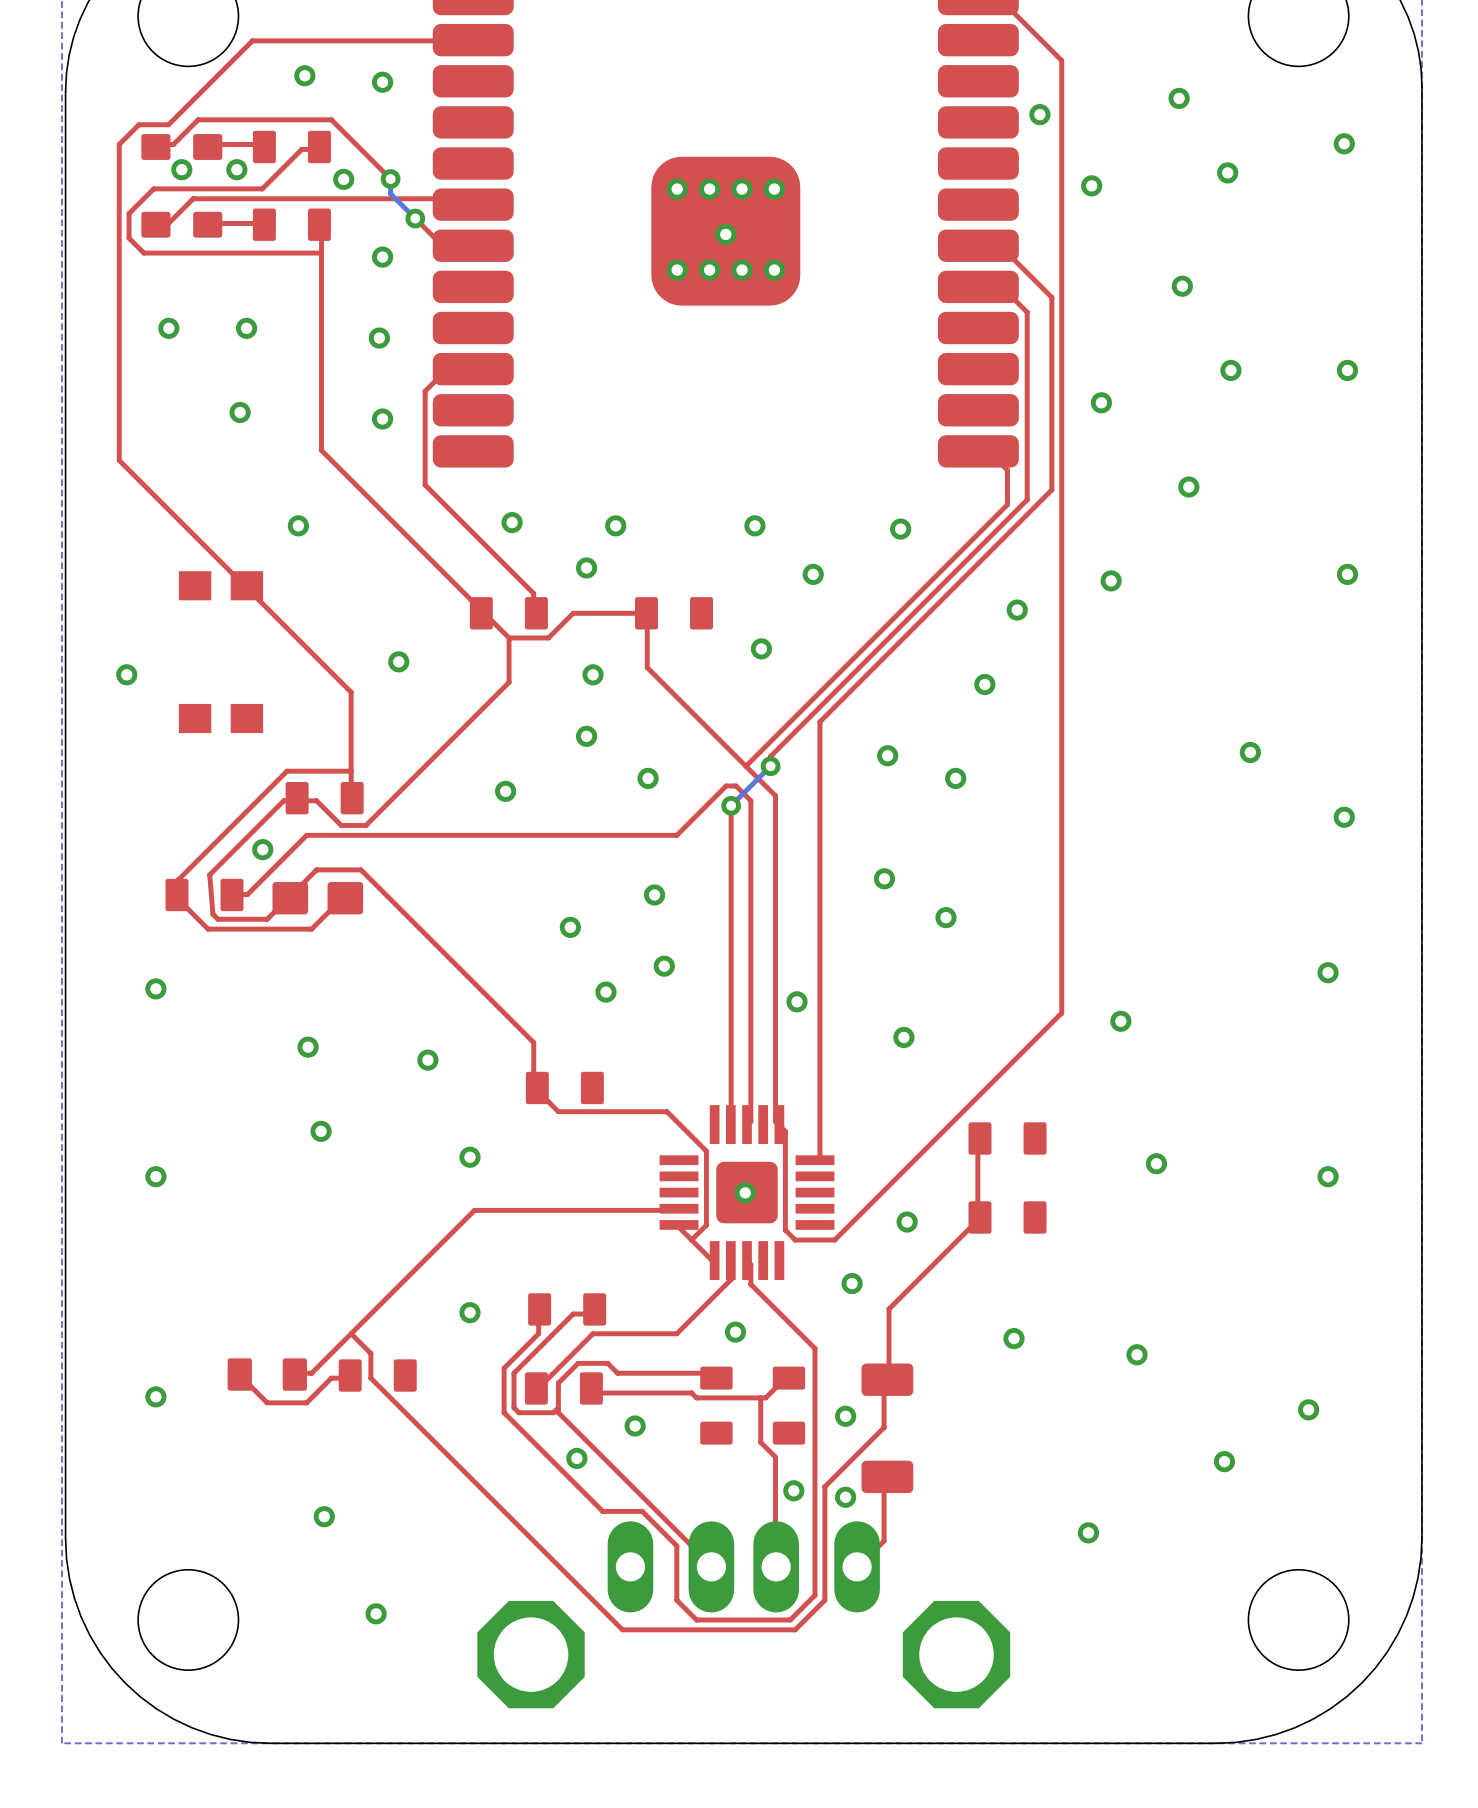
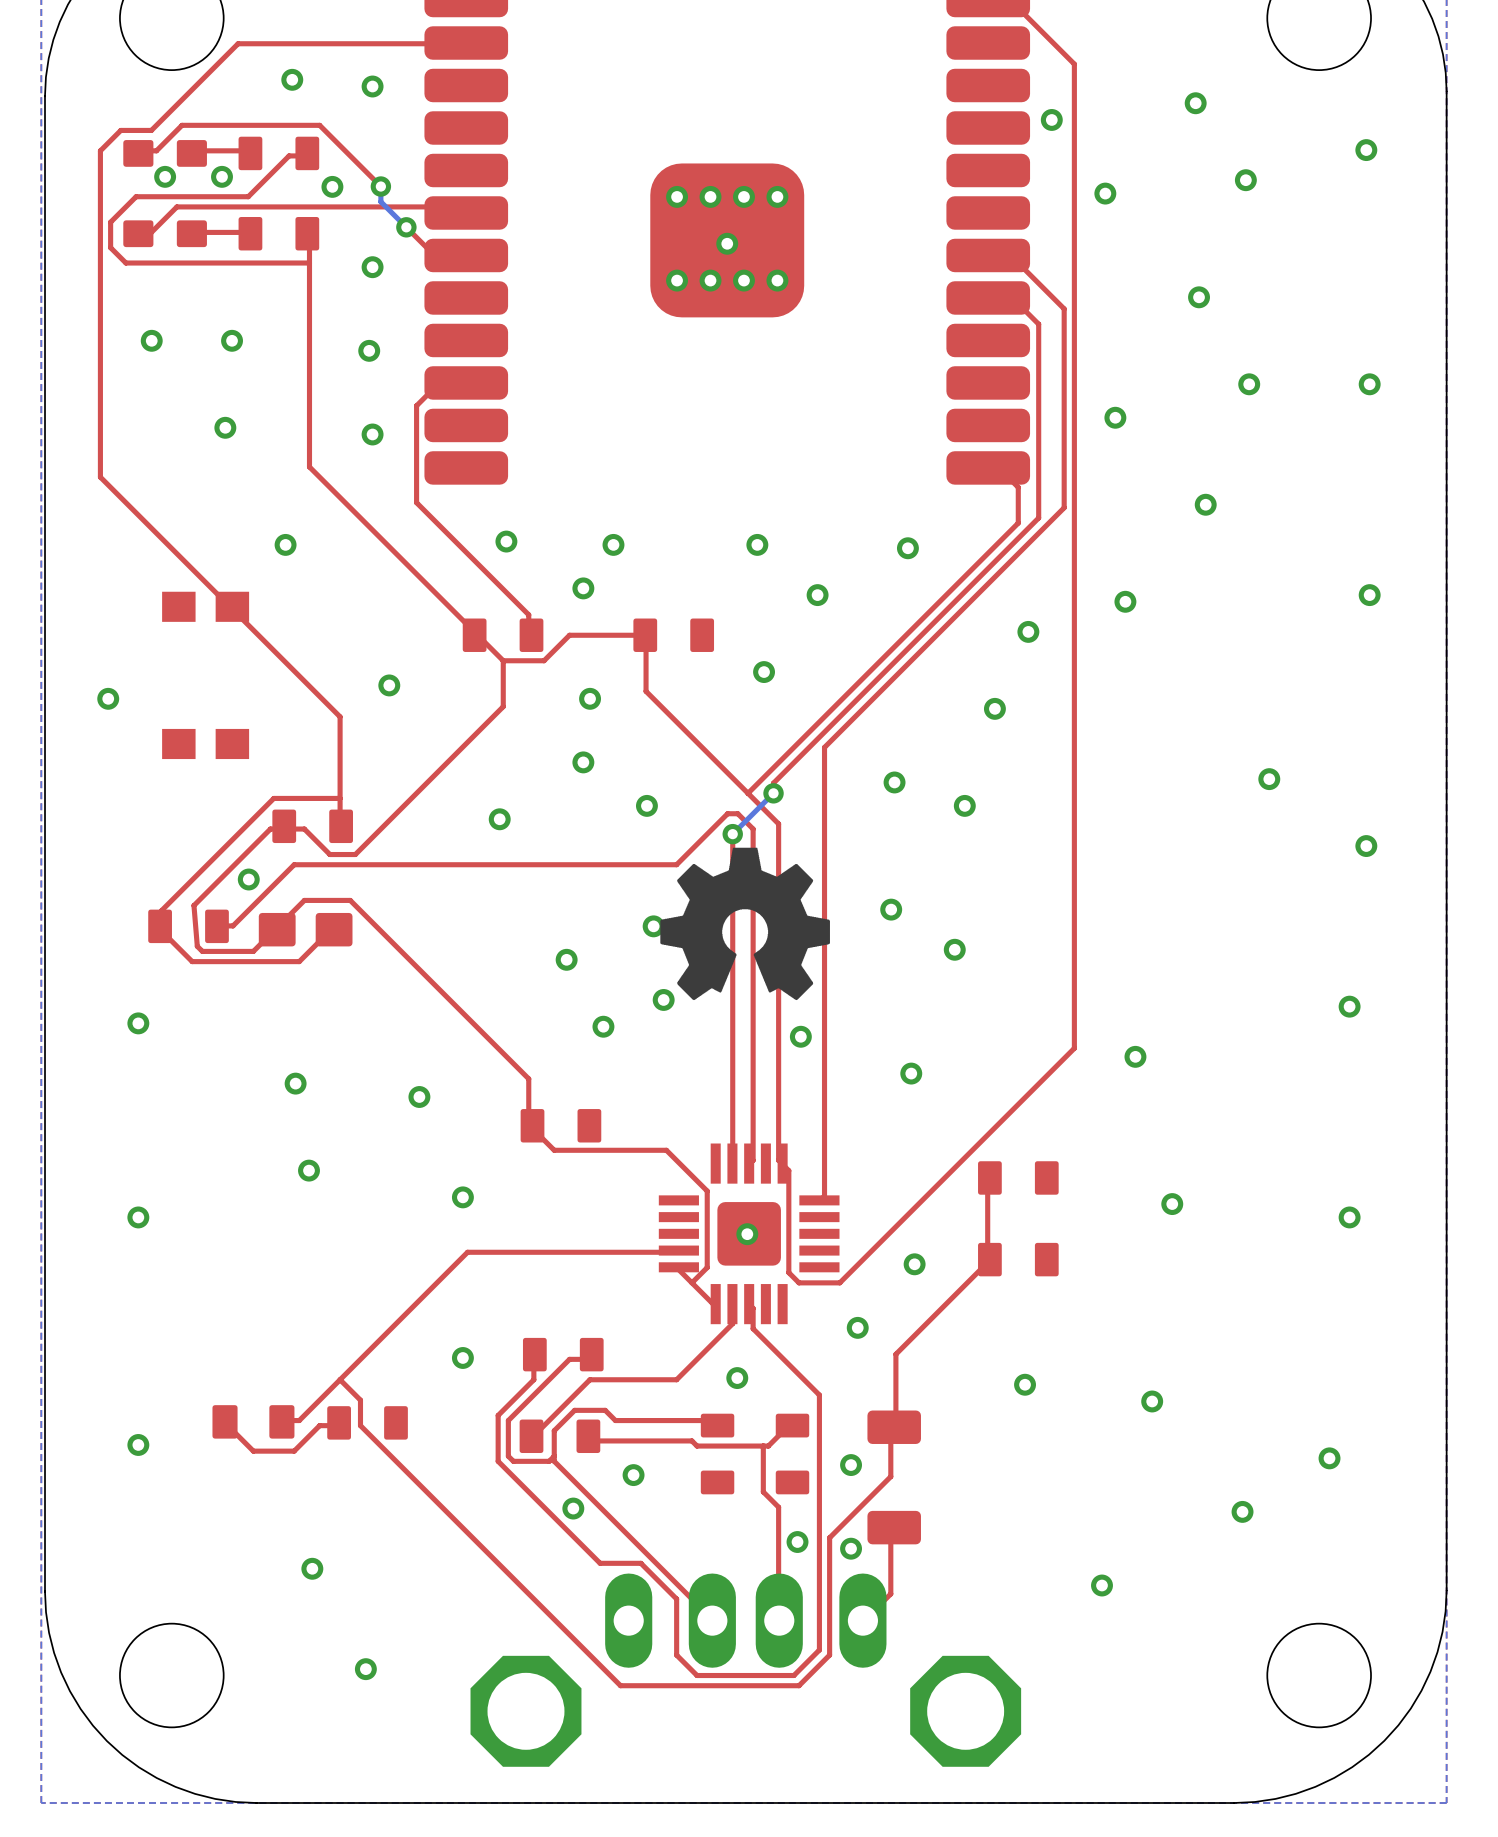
drawing: none -> [660, 847, 830, 1001]

